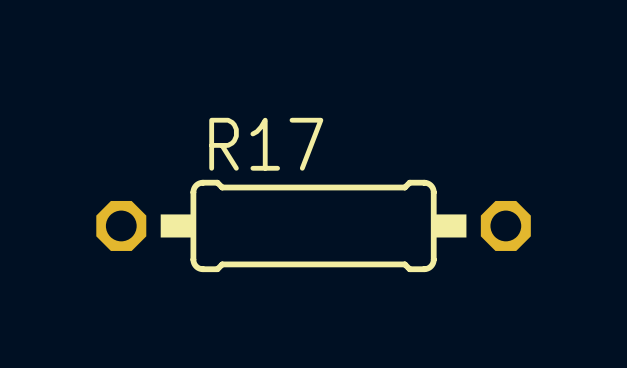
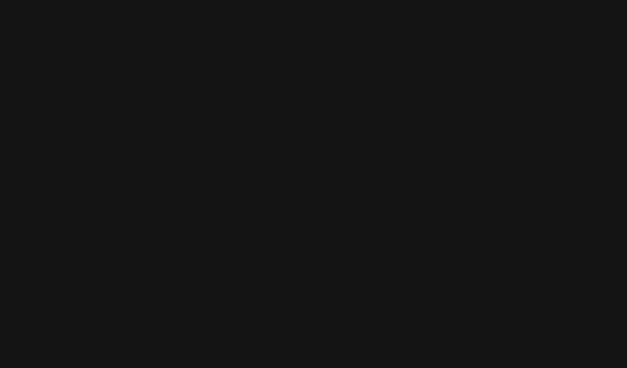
R17: (313, 225) -> none

